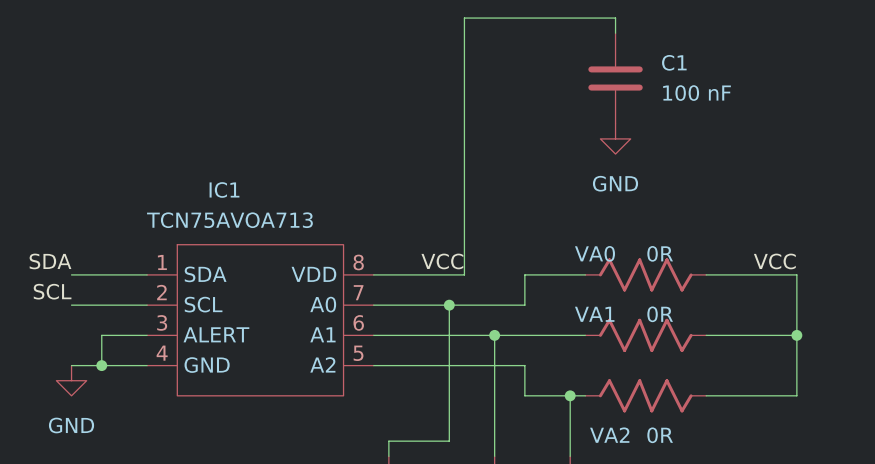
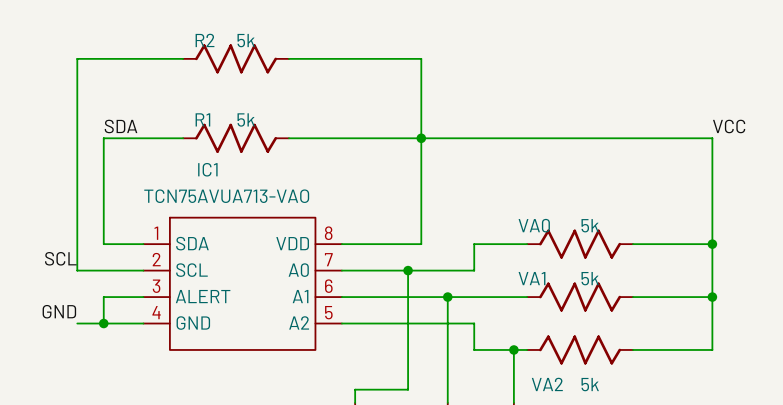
wire: (615, 33) (615, 18) (464, 18) (464, 63) -> (288, 58) (421, 58)
wire: none -> (183, 58) (77, 58) (77, 270)
R2: none -> 5k (236, 58)
C1: 100 nF (615, 78) -> none
power symbol: GND (615, 138) -> none
R1: none -> 5k (236, 138)
wire: none -> (288, 138) (712, 138) (712, 244)
junction: none -> (421, 138)
IC1 value: TCN75AVOA713 (229, 220) -> TCN75AVUA713-VAO (226, 196)
VA0 value: 0R (660, 253) -> 5k (590, 225)
label position: SDA (50, 261) -> SDA (121, 126)
label: VCC (442, 261) -> none
label position: VCC (774, 261) -> VCC (729, 126)
wire: (71, 274) (101, 274) -> (183, 138) (103, 138) (103, 244)
junction: none -> (712, 244)
VA1 value: 0R (660, 314) -> 5k (590, 278)
label: none -> GND (59, 311)
power symbol: GND (71, 380) -> none
VA2 value: 0R (660, 435) -> 5k (590, 384)

